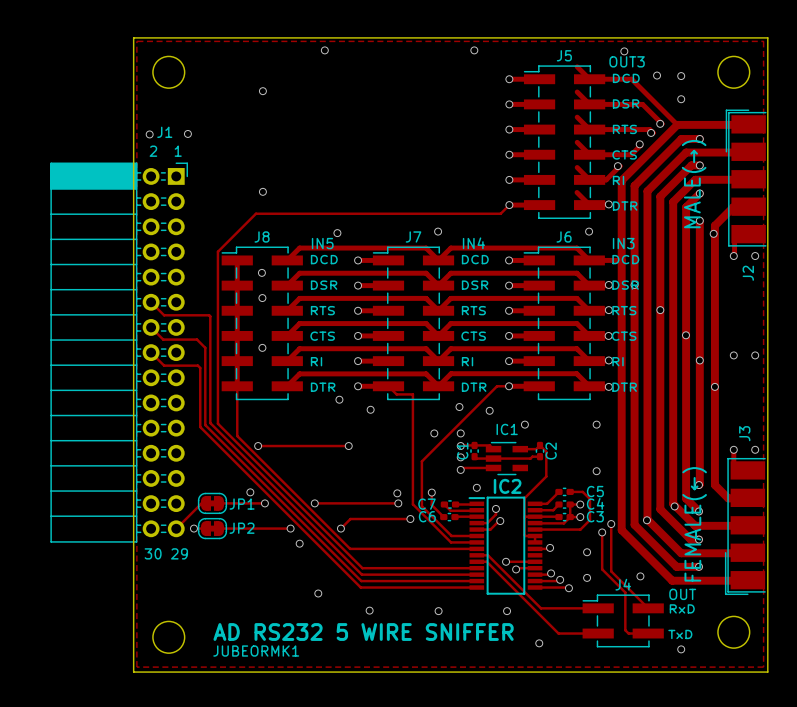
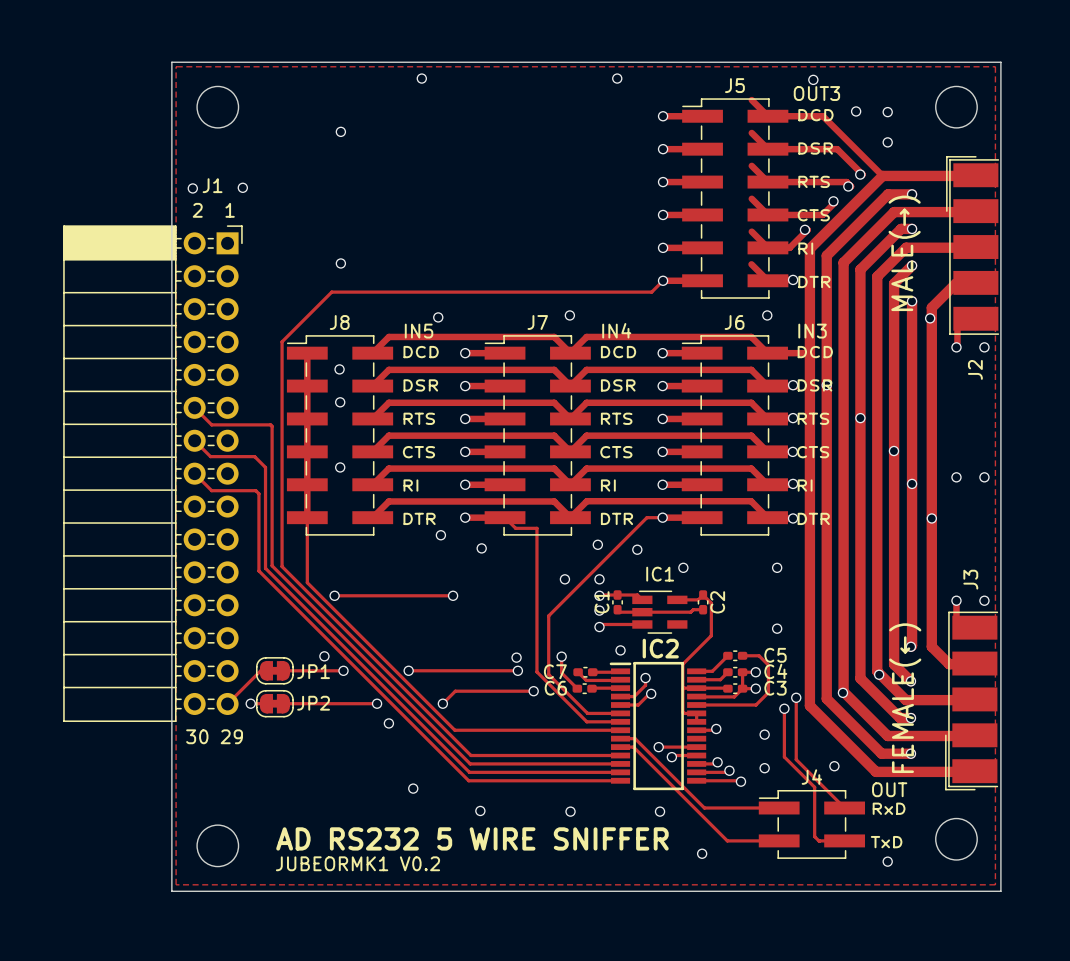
text: JUBEORMK1 (256, 651) -> JUBEORMK1 V0.2 (357, 863)

